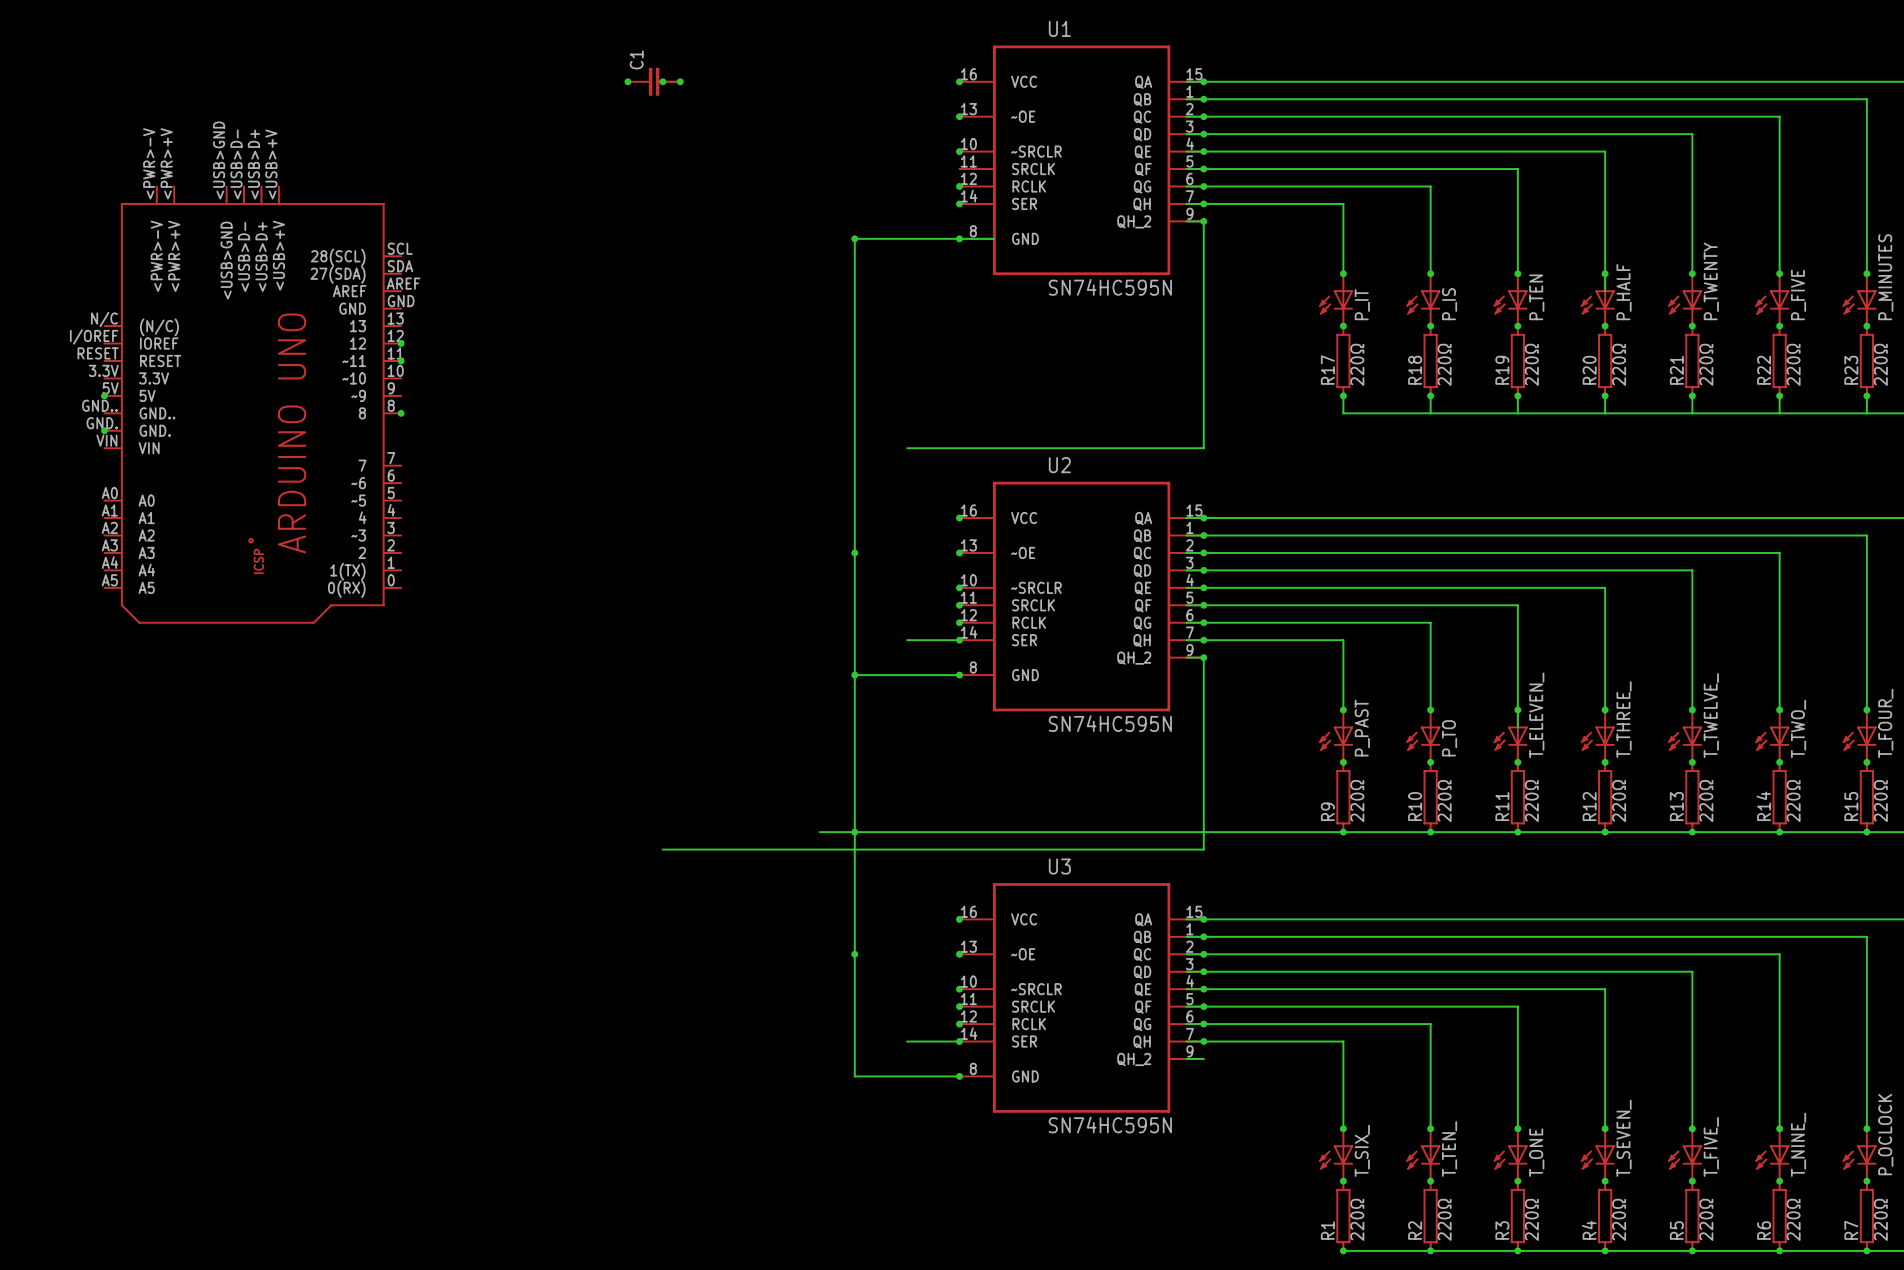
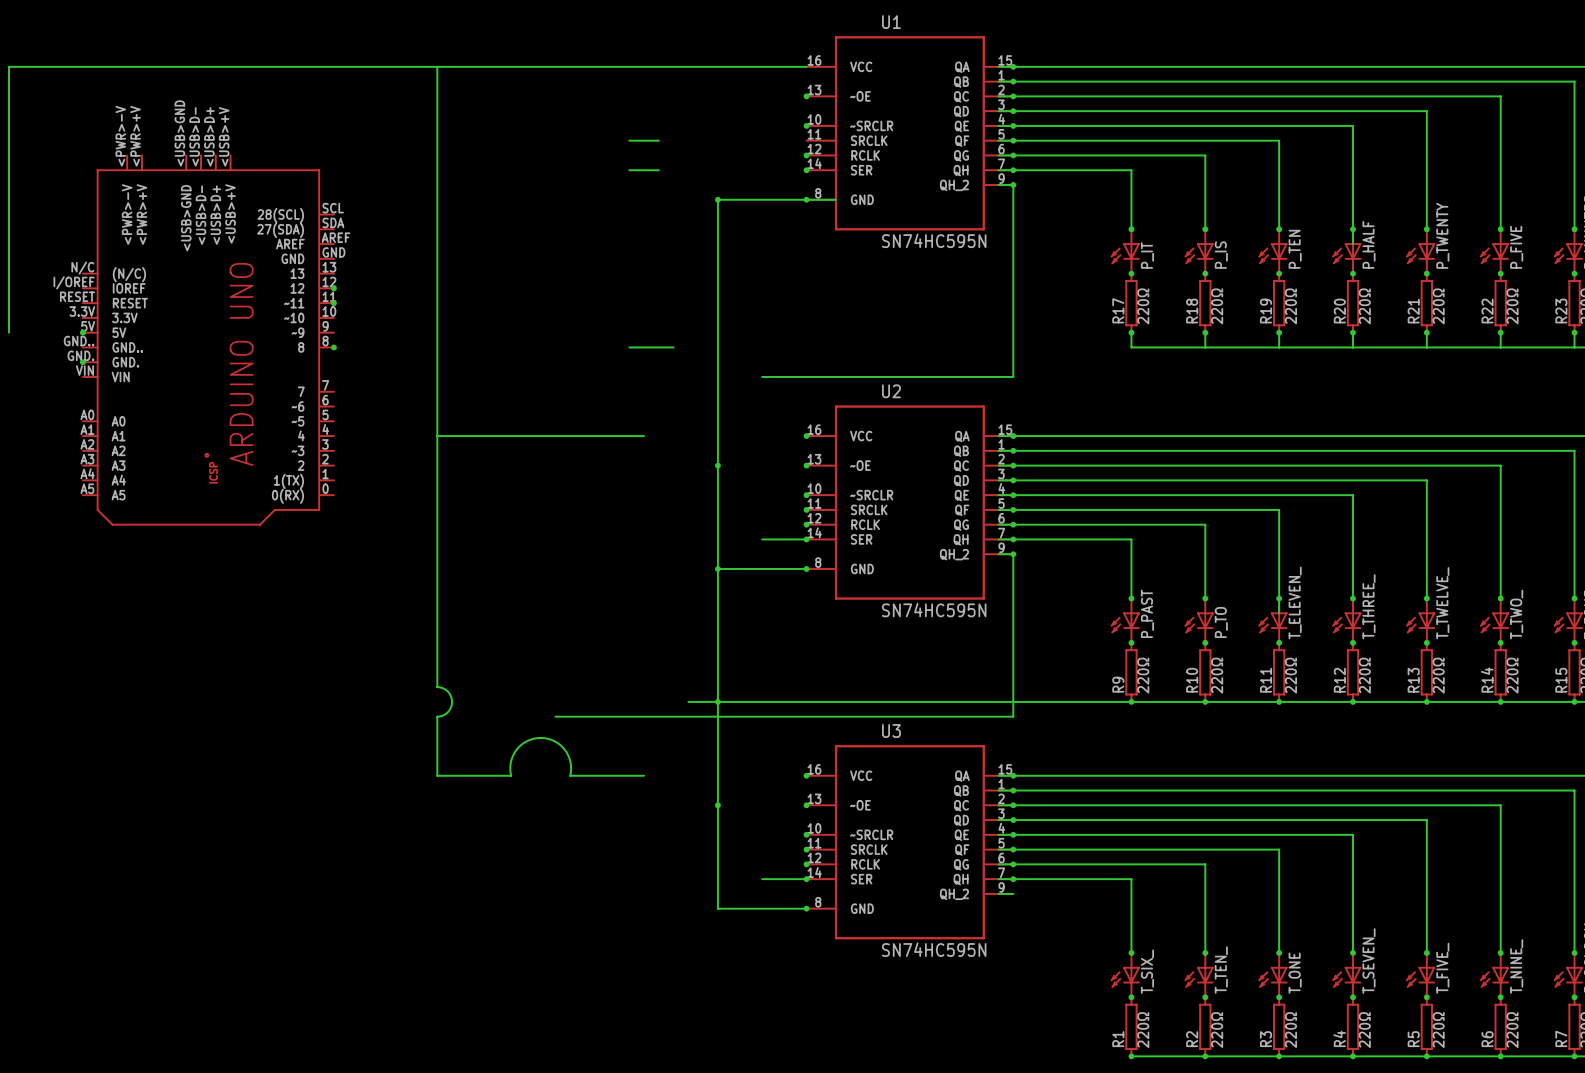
wire: none -> (437, 66) (437, 687) (447, 691) (452, 701) (447, 712) (437, 716) (437, 775) (511, 775) (510, 762) (516, 749) (527, 741) (540, 737) (554, 741) (564, 749) (570, 762) (570, 775) (644, 775)
junction: (627, 81) -> none
C1: (654, 81) -> none
junction: (662, 81) -> none
junction: (680, 81) -> none
wire: none -> (806, 66) (9, 66) (9, 332)
junction: (959, 81) -> none
wire: none -> (629, 140) (658, 140)
wire: none -> (629, 170) (658, 170)
wire: none -> (629, 347) (673, 347)
wire: none -> (437, 436) (644, 436)

